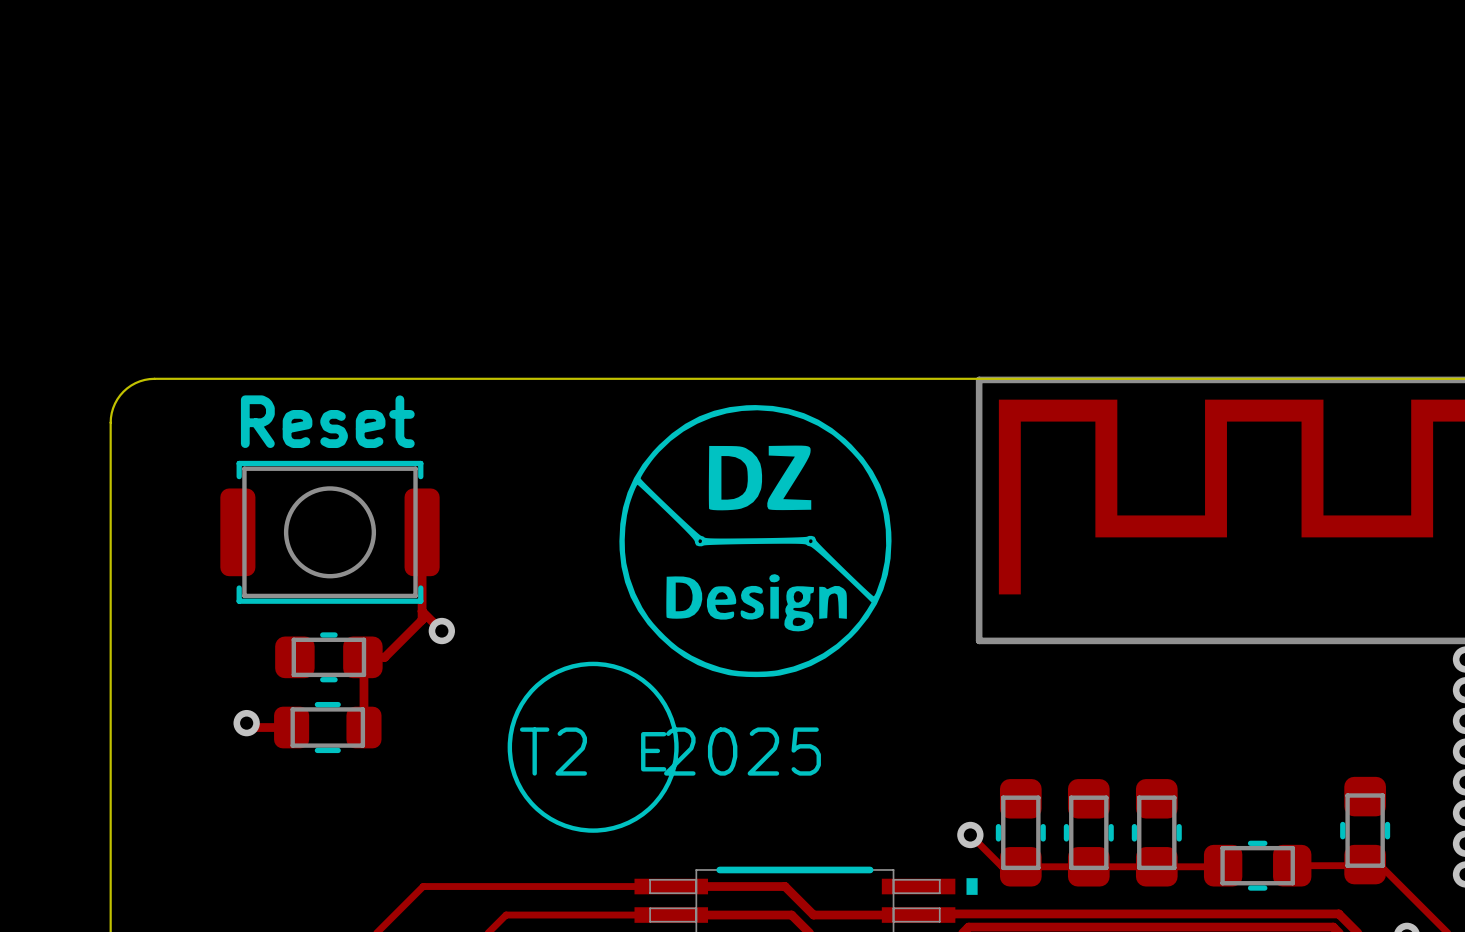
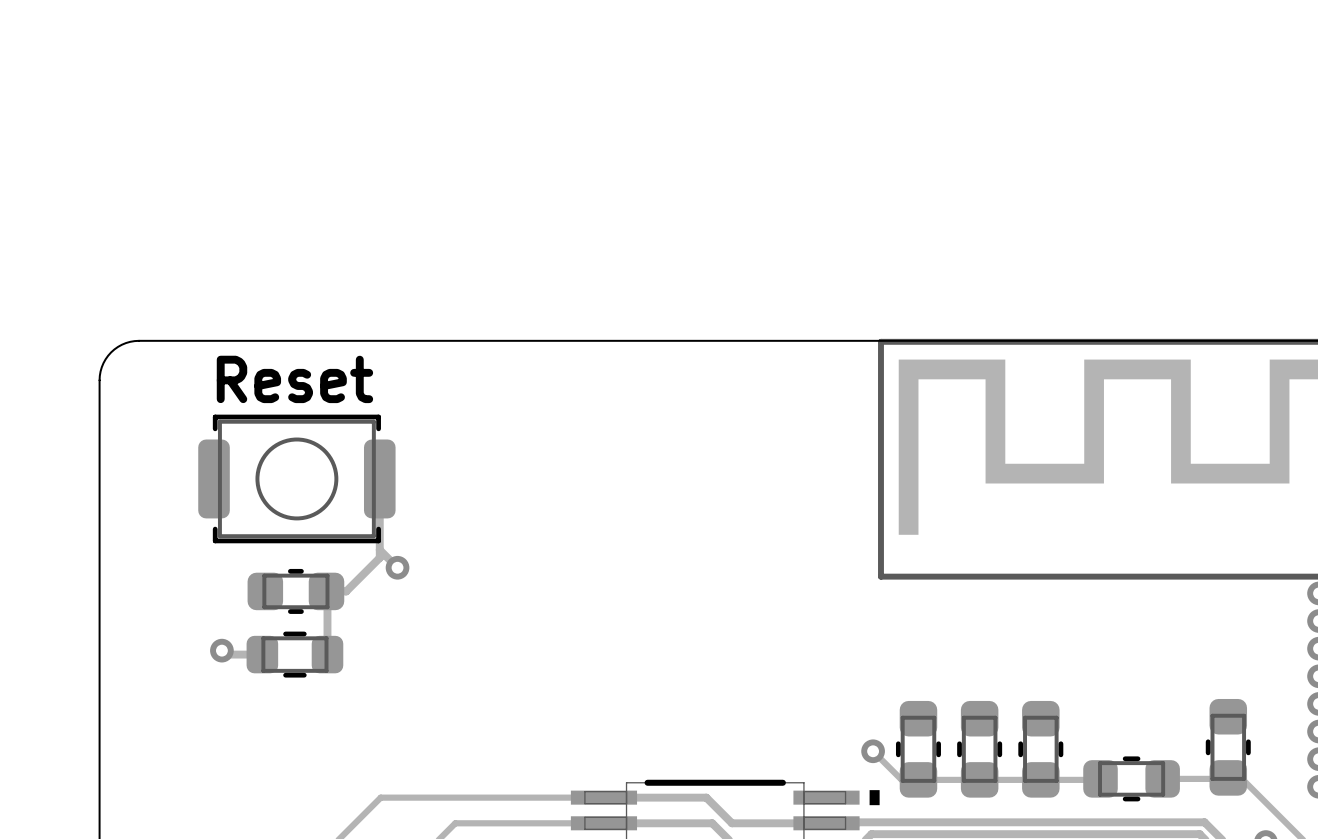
drawing: [507, 405, 892, 833] -> none
text: E (653, 751) -> none
text: T2 2025 (670, 751) -> none

